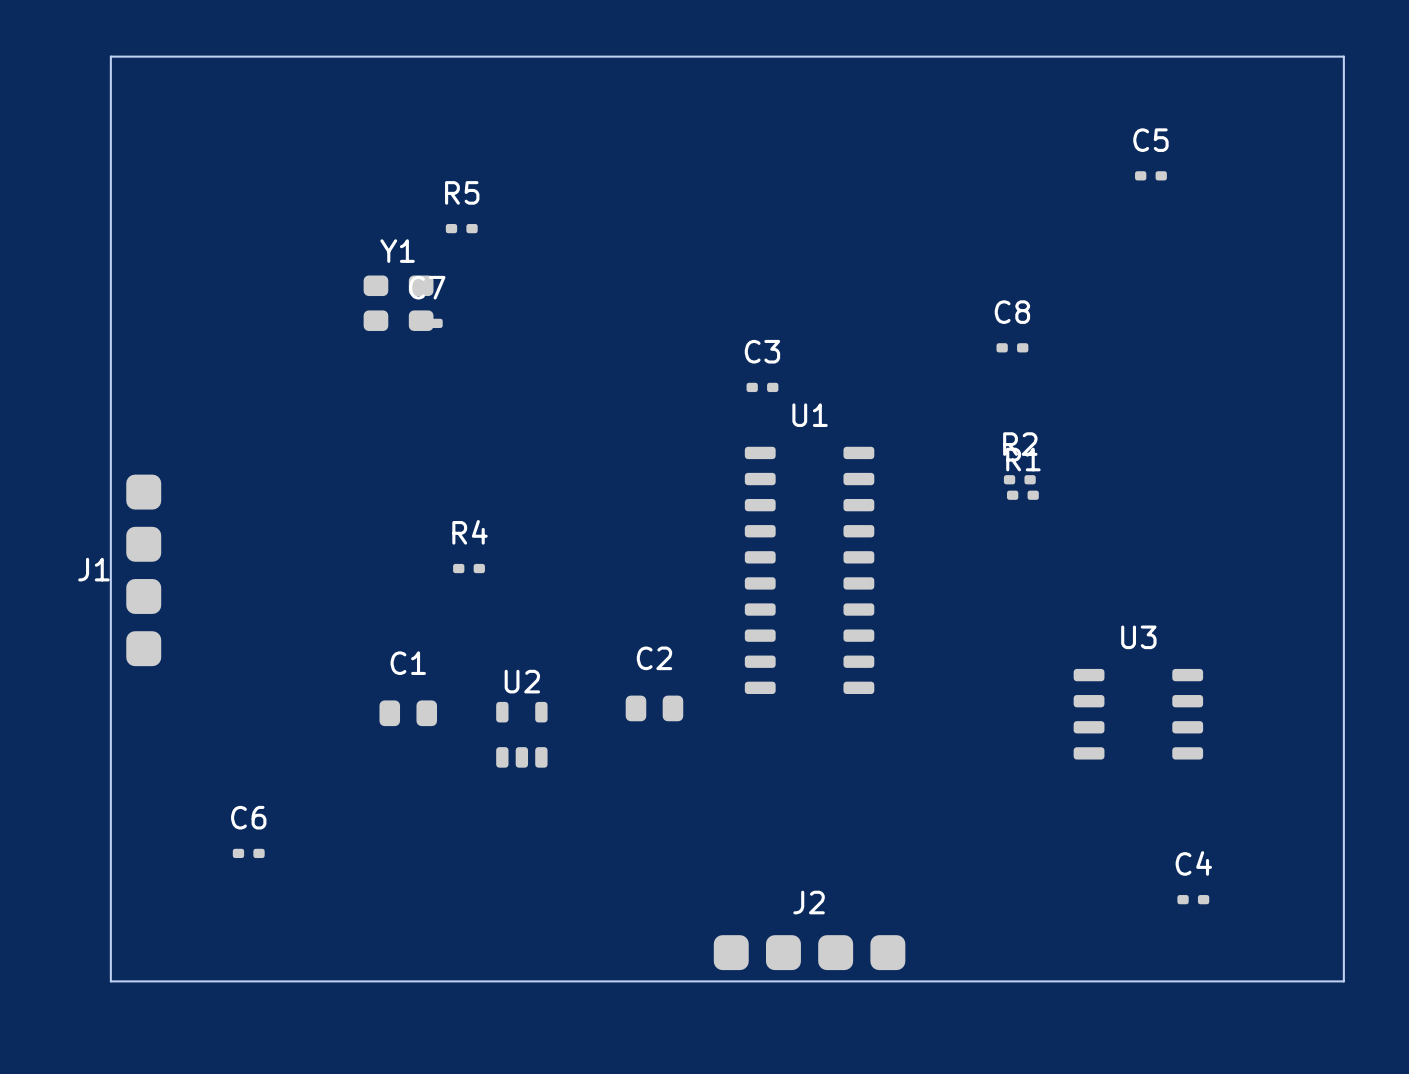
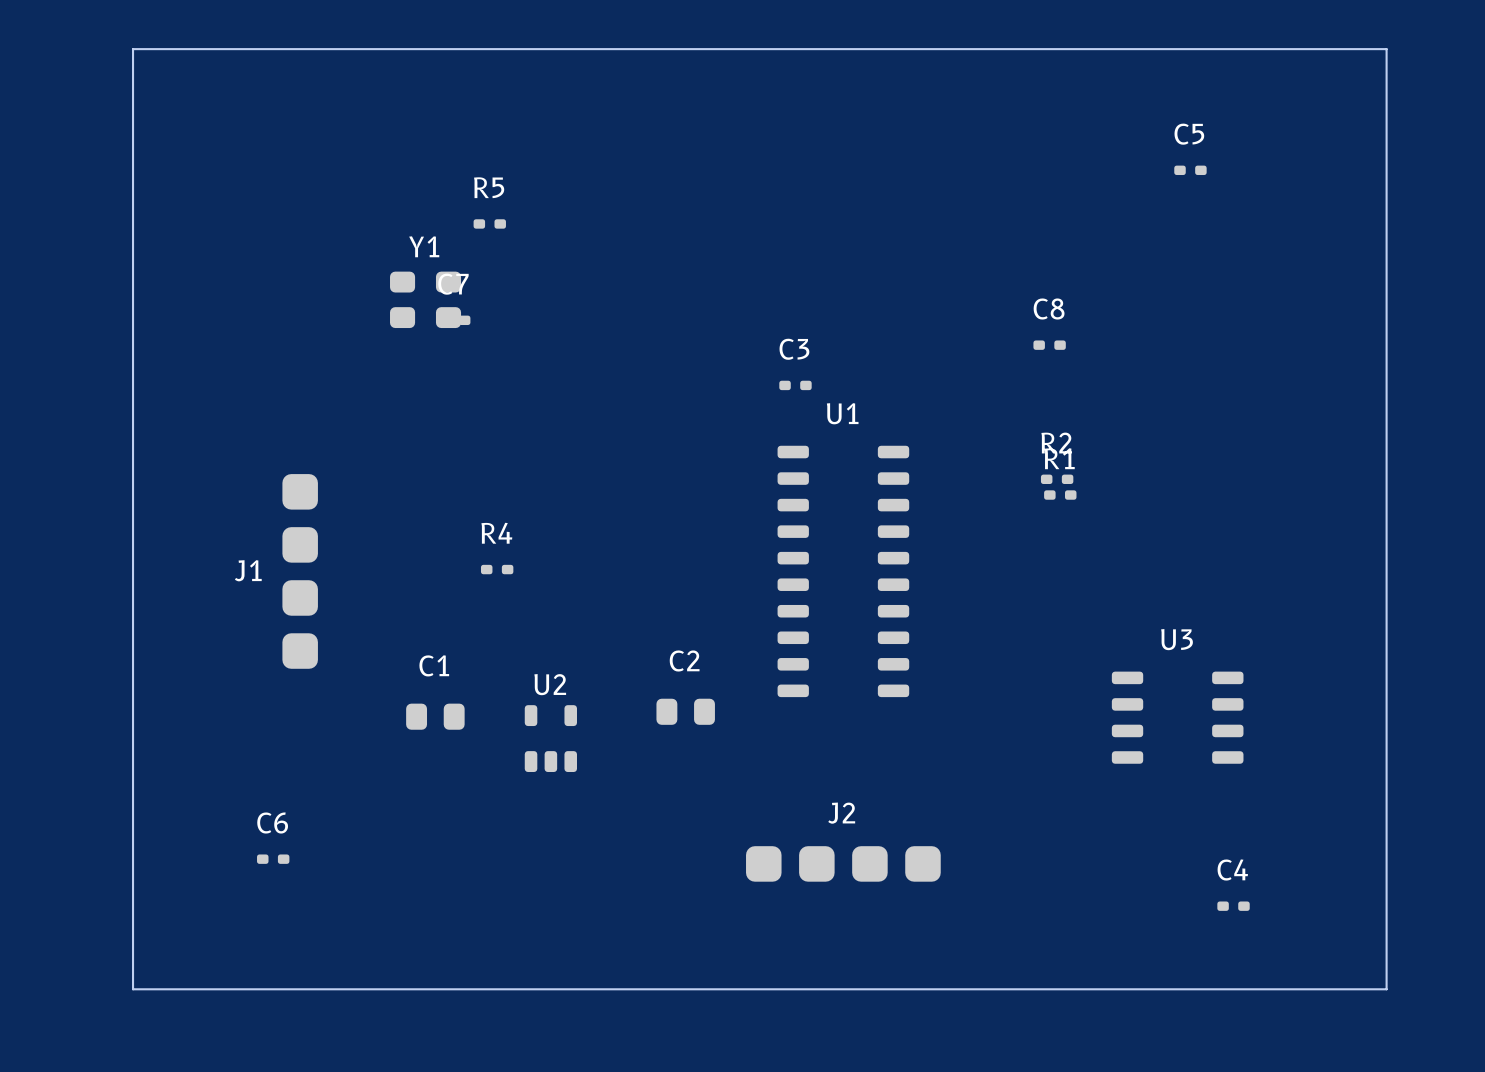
J1 position: (143, 570) -> (300, 571)
J2 position: (809, 952) -> (843, 863)

